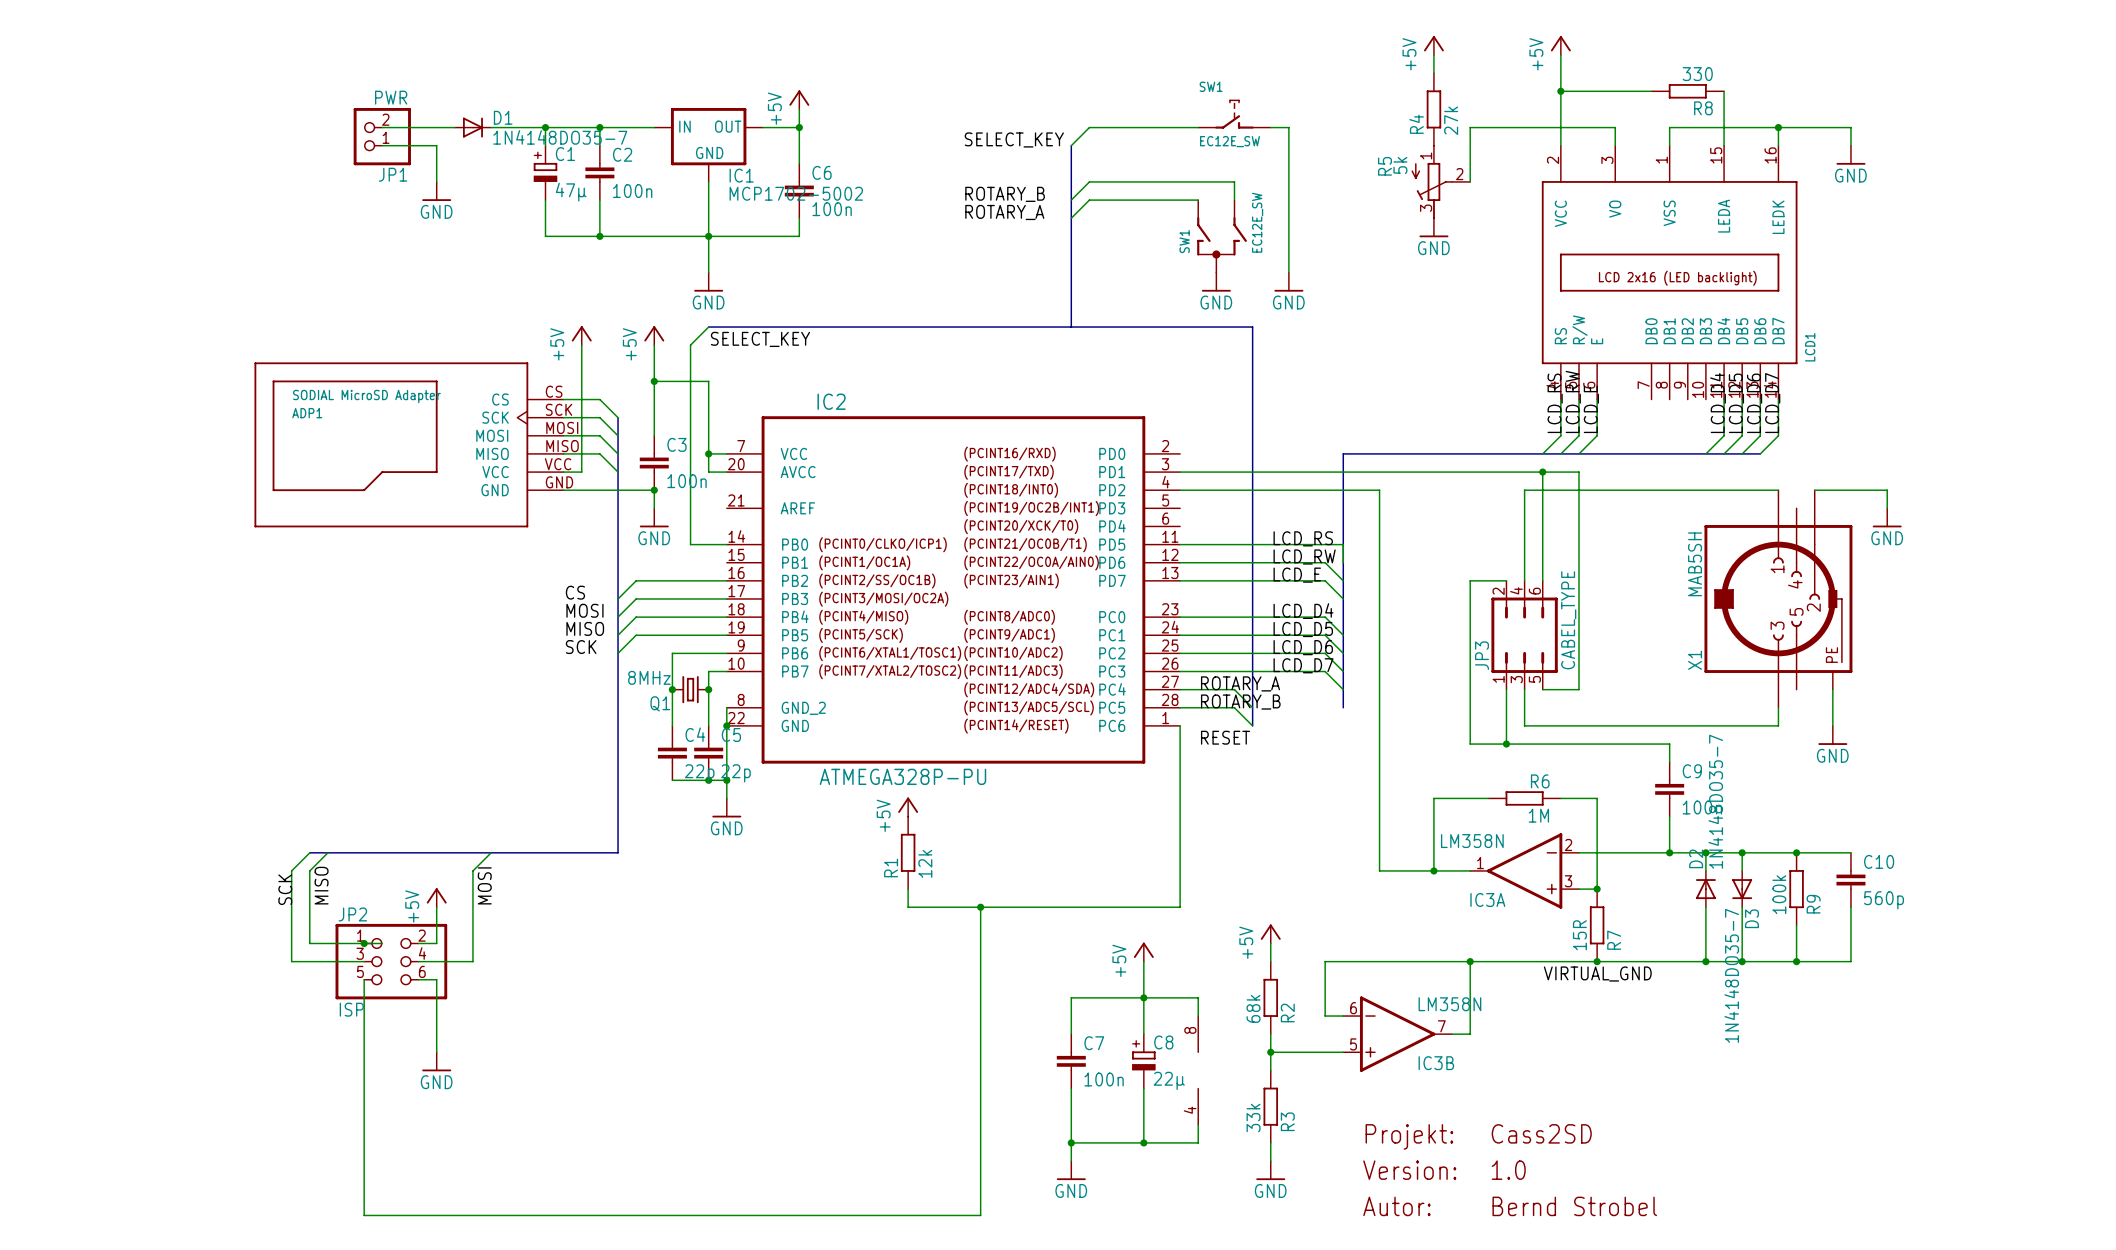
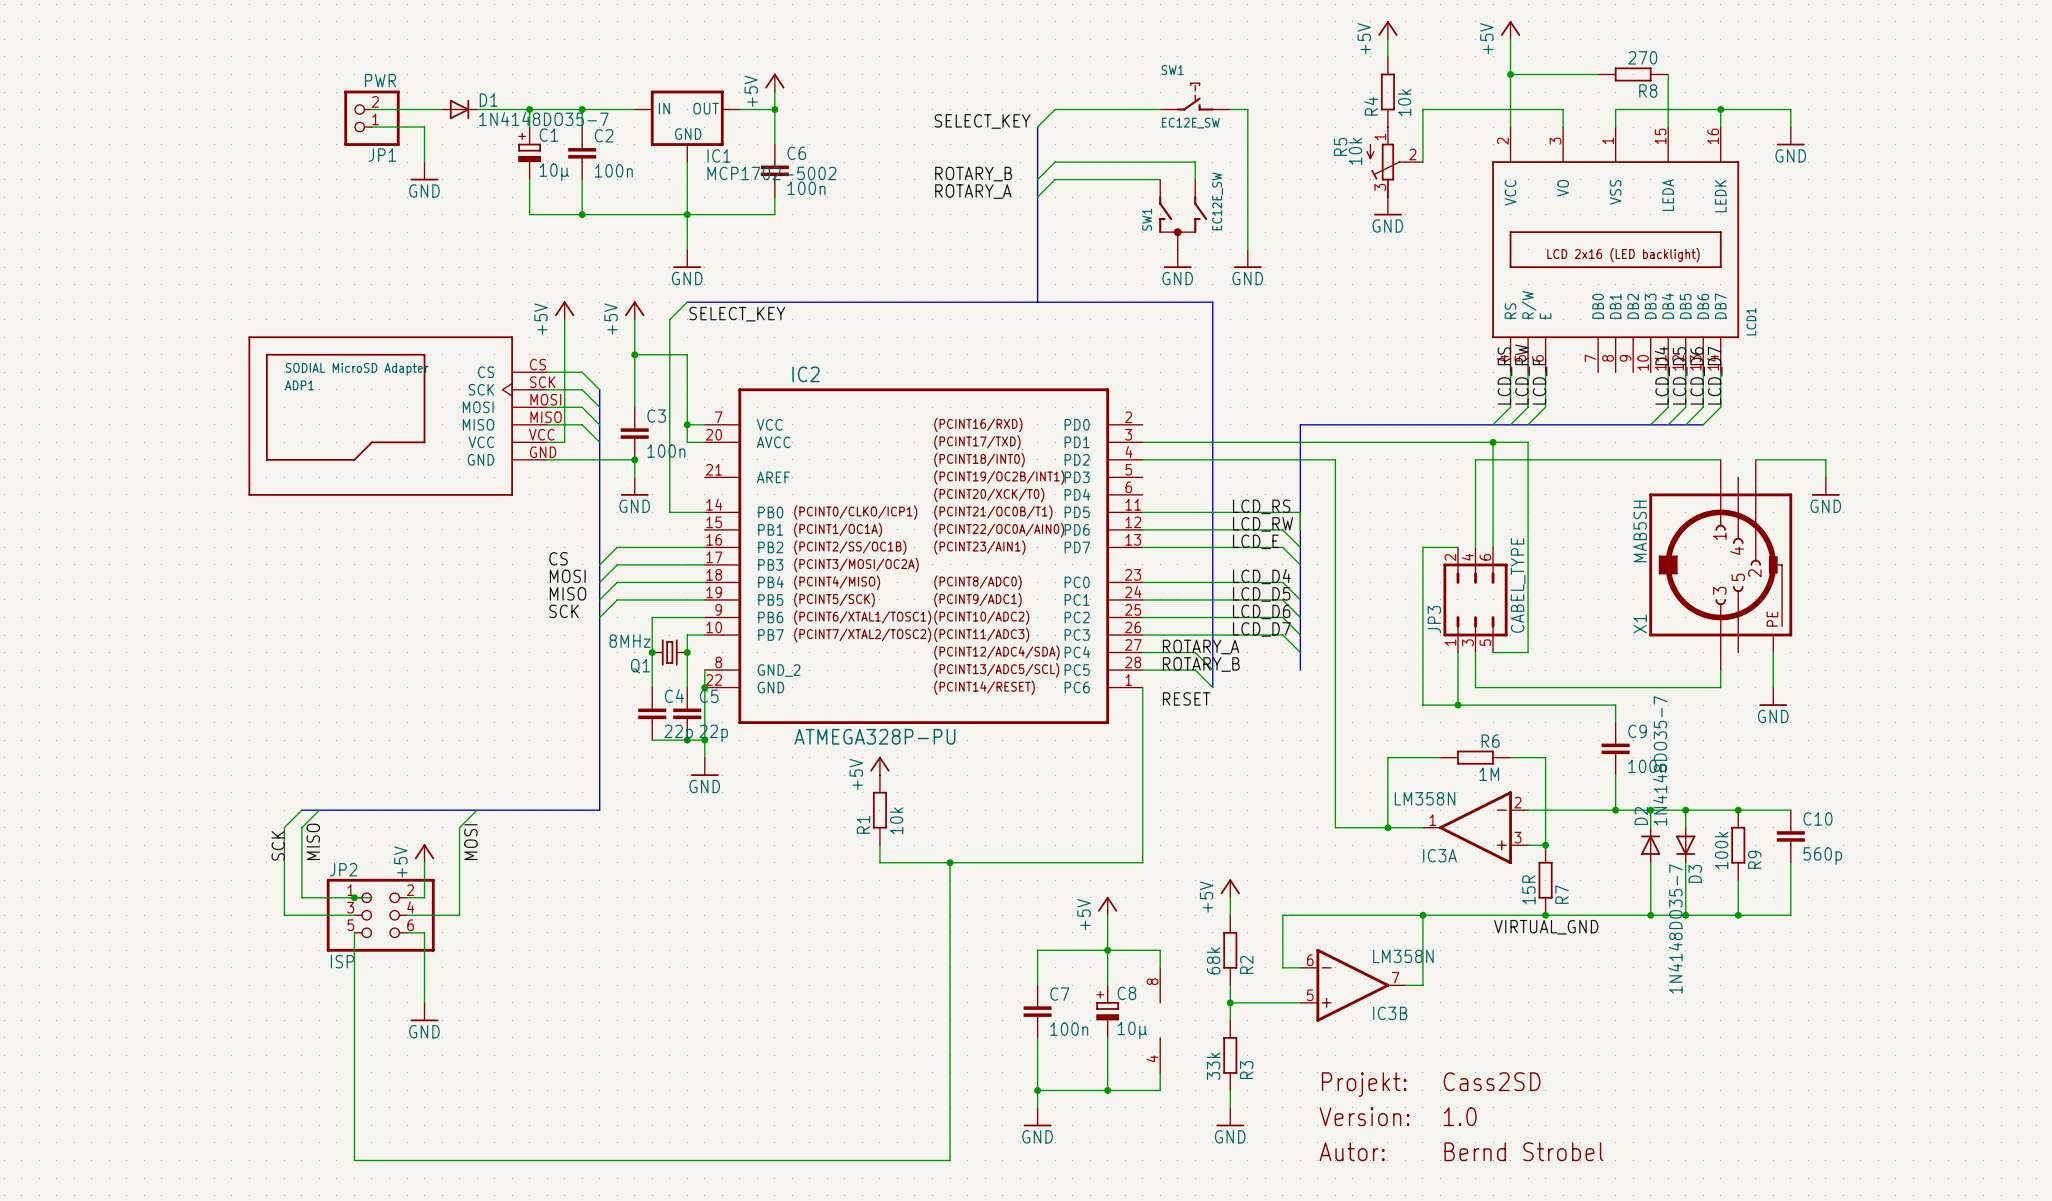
R8 value: 330 (1697, 74) -> 270 (1642, 57)
R4 value: 27k (1451, 120) -> 10k (1404, 102)
R5 value: 5k (1400, 165) -> 10k (1355, 151)
C1 value: 47µ (571, 192) -> 10µ (554, 172)
R1 value: 12k (925, 863) -> 10k (896, 820)
C8 value: 22µ (1169, 1080) -> 10µ (1132, 1030)

